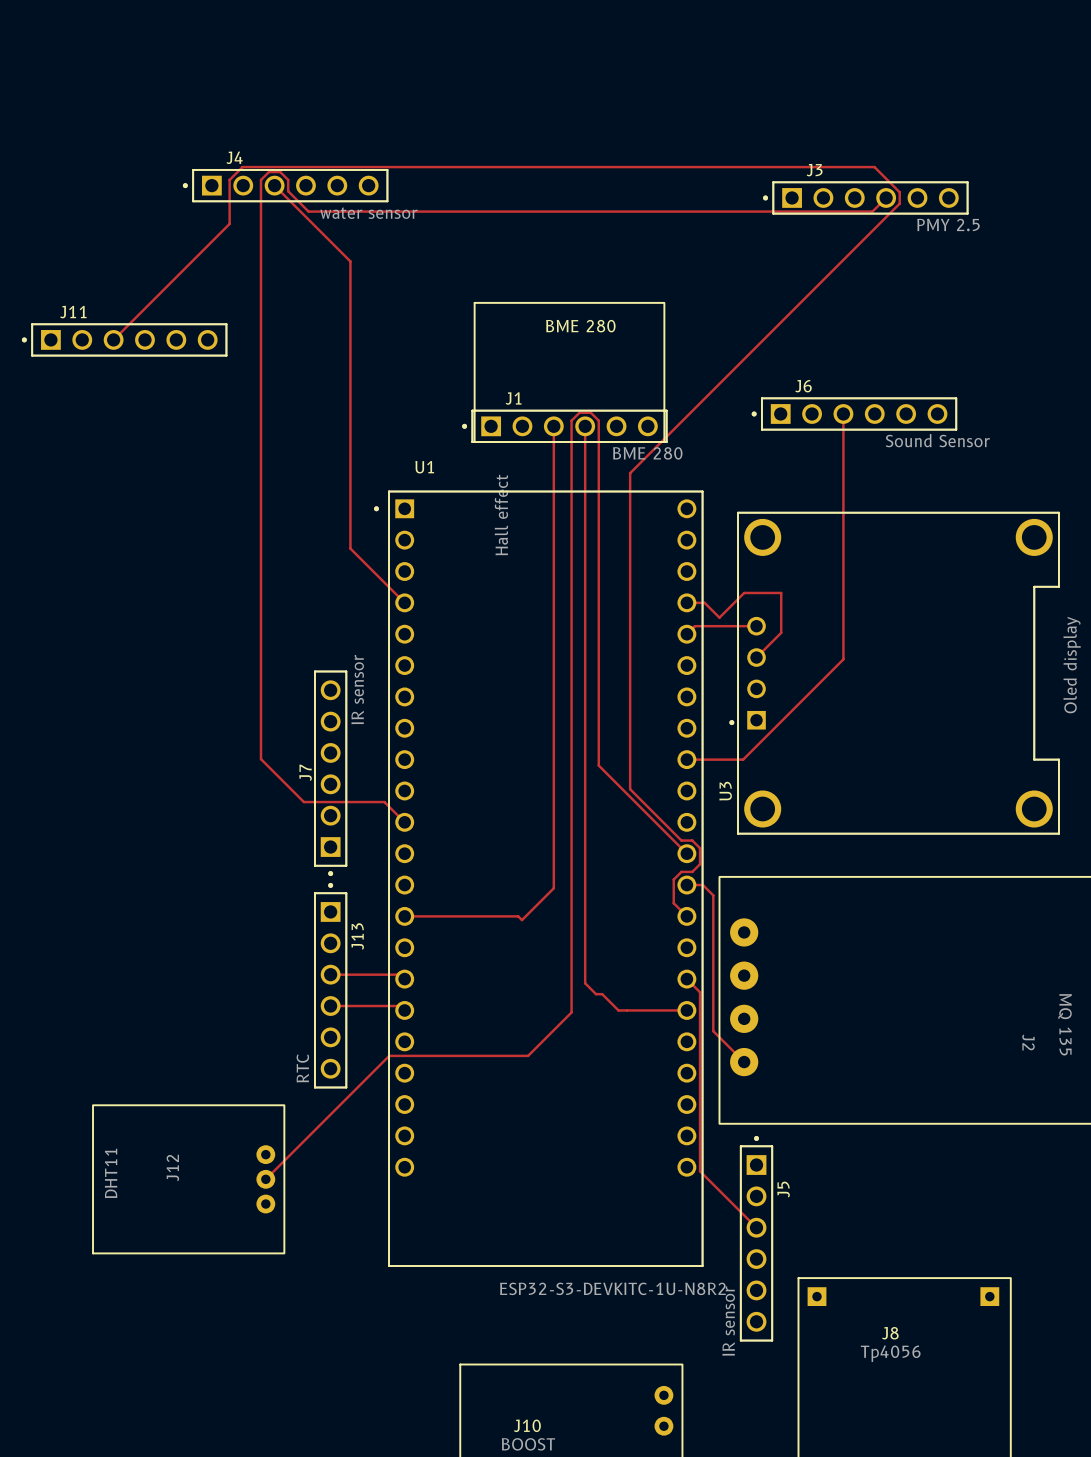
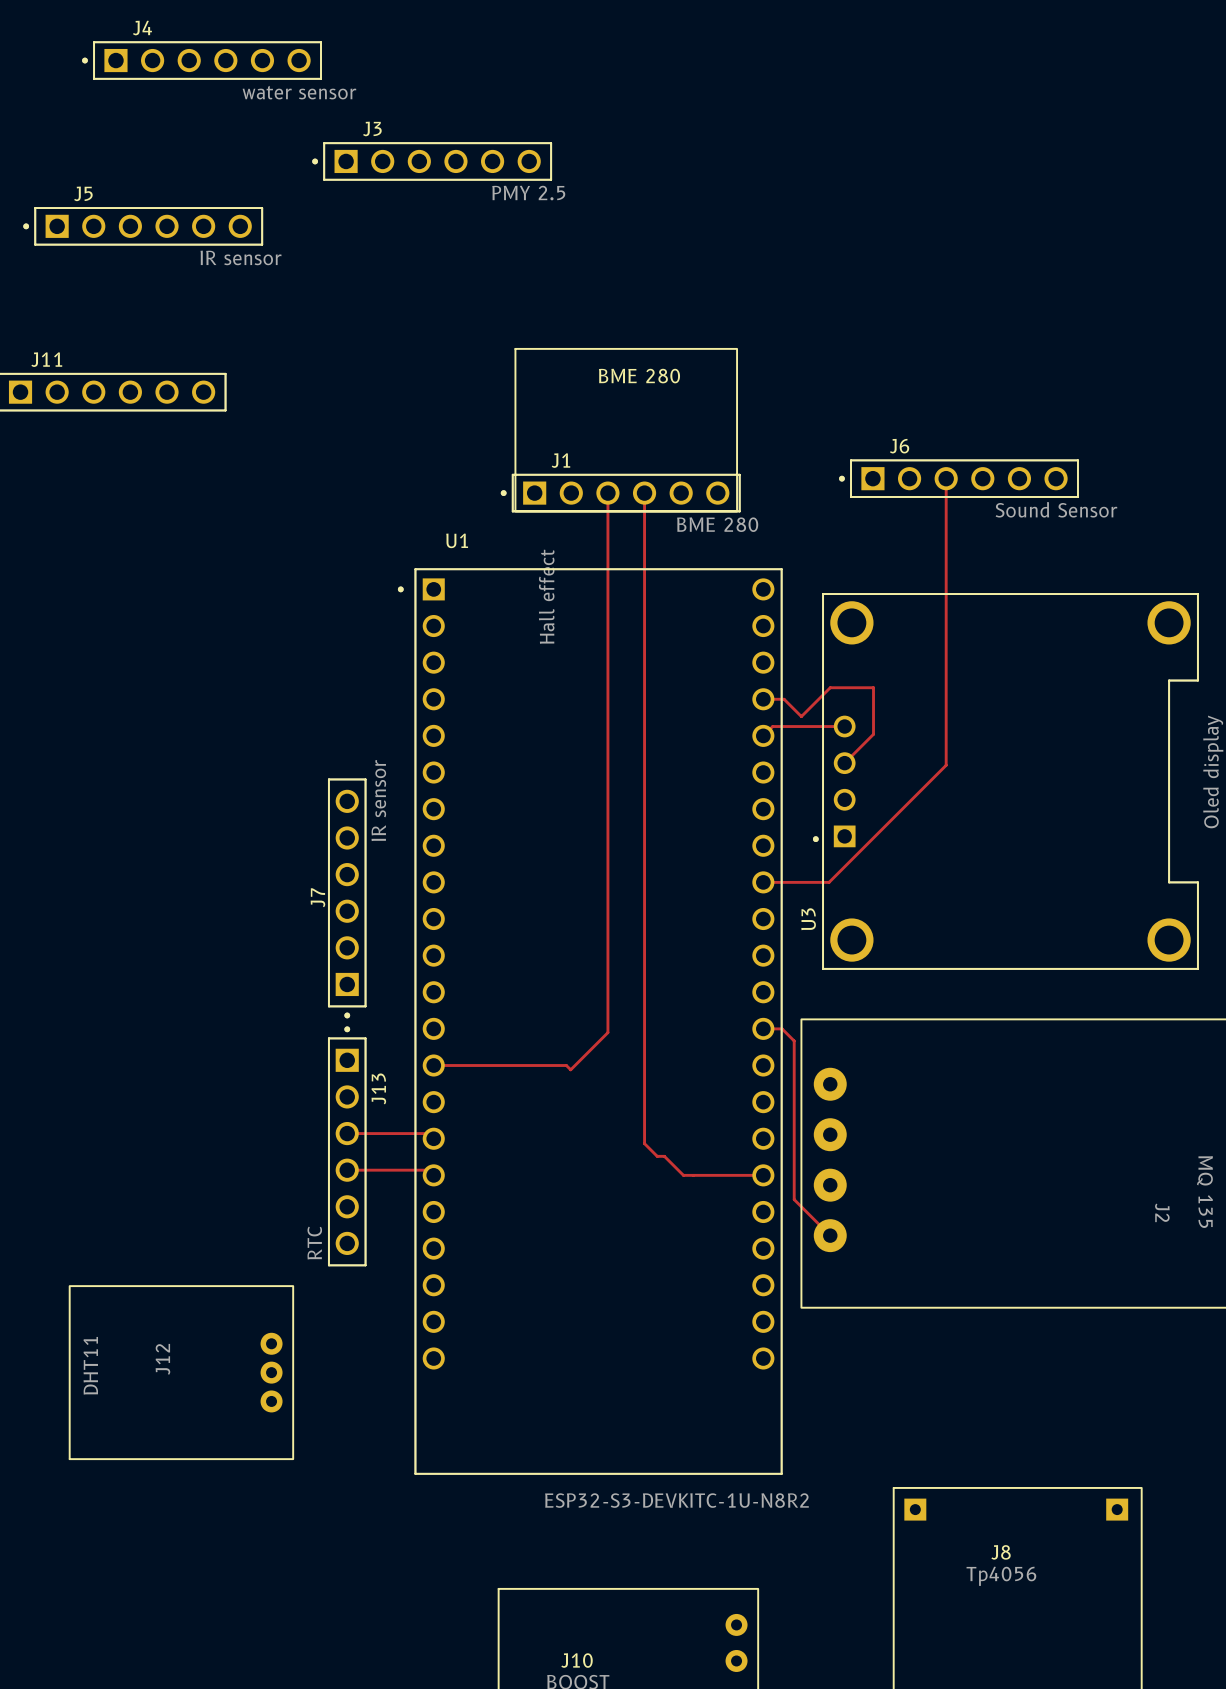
track: (274, 185) (350, 261) (350, 548) (404, 602) -> none
J4 position: (285, 185) -> (202, 60)
J3 position: (865, 197) -> (432, 161)
track: (886, 197) (872, 211) (308, 211) (288, 191) (288, 179) (280, 172) (268, 172) (260, 179) (260, 759) (303, 802) (384, 802) (404, 822) -> none
track: (113, 339) (229, 223) (229, 179) (242, 167) (874, 167) (899, 192) (899, 203) (630, 473) (630, 789) (681, 840) (692, 840) (700, 848) (700, 864) (692, 871) (681, 871) (673, 879) (673, 903) (686, 916) -> none
track: (686, 853) (598, 765) (598, 420) (590, 412) (579, 412) (571, 420) (571, 1012) (528, 1055) (389, 1055) (265, 1179) -> none
track: (686, 979) (700, 992) (700, 1171) (756, 1227) -> none
J5 rotation: 0° (756, 1238) -> 90° counterclockwise (143, 226)
J5 position: (756, 1238) -> (143, 226)

